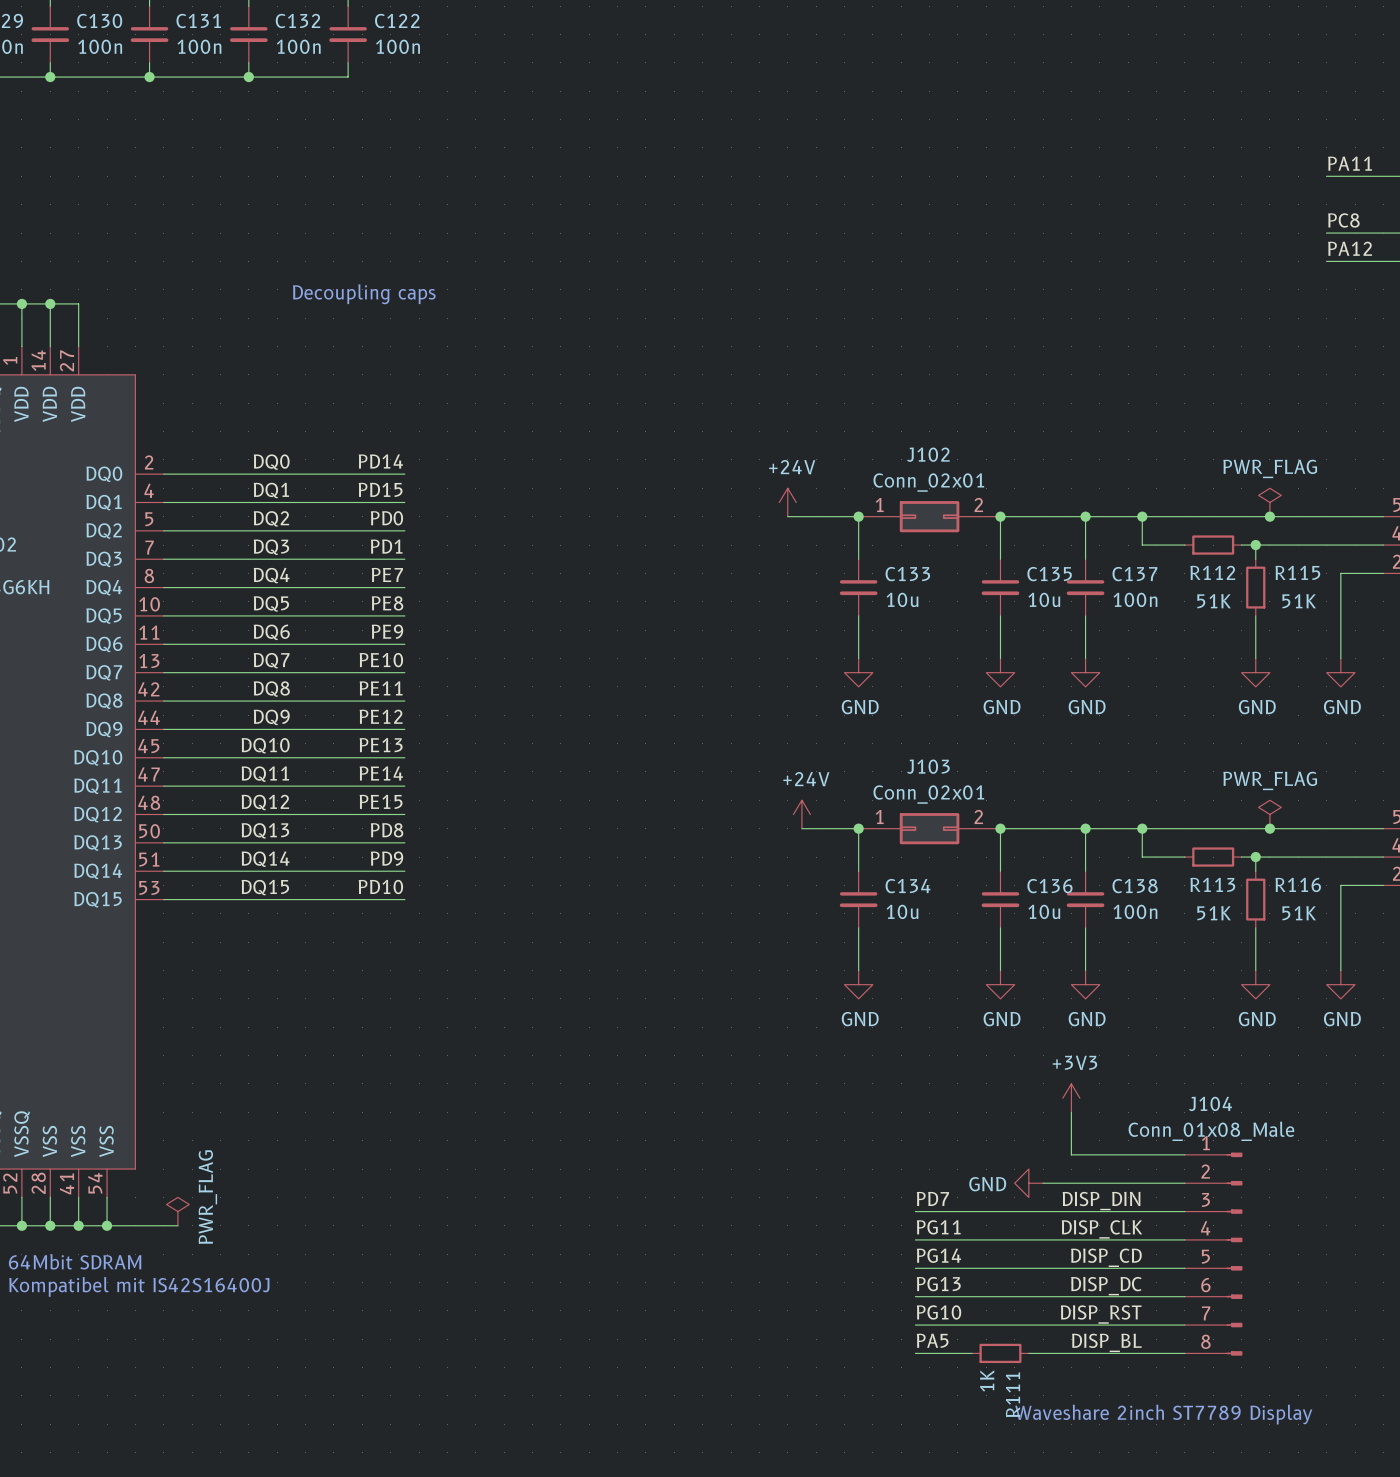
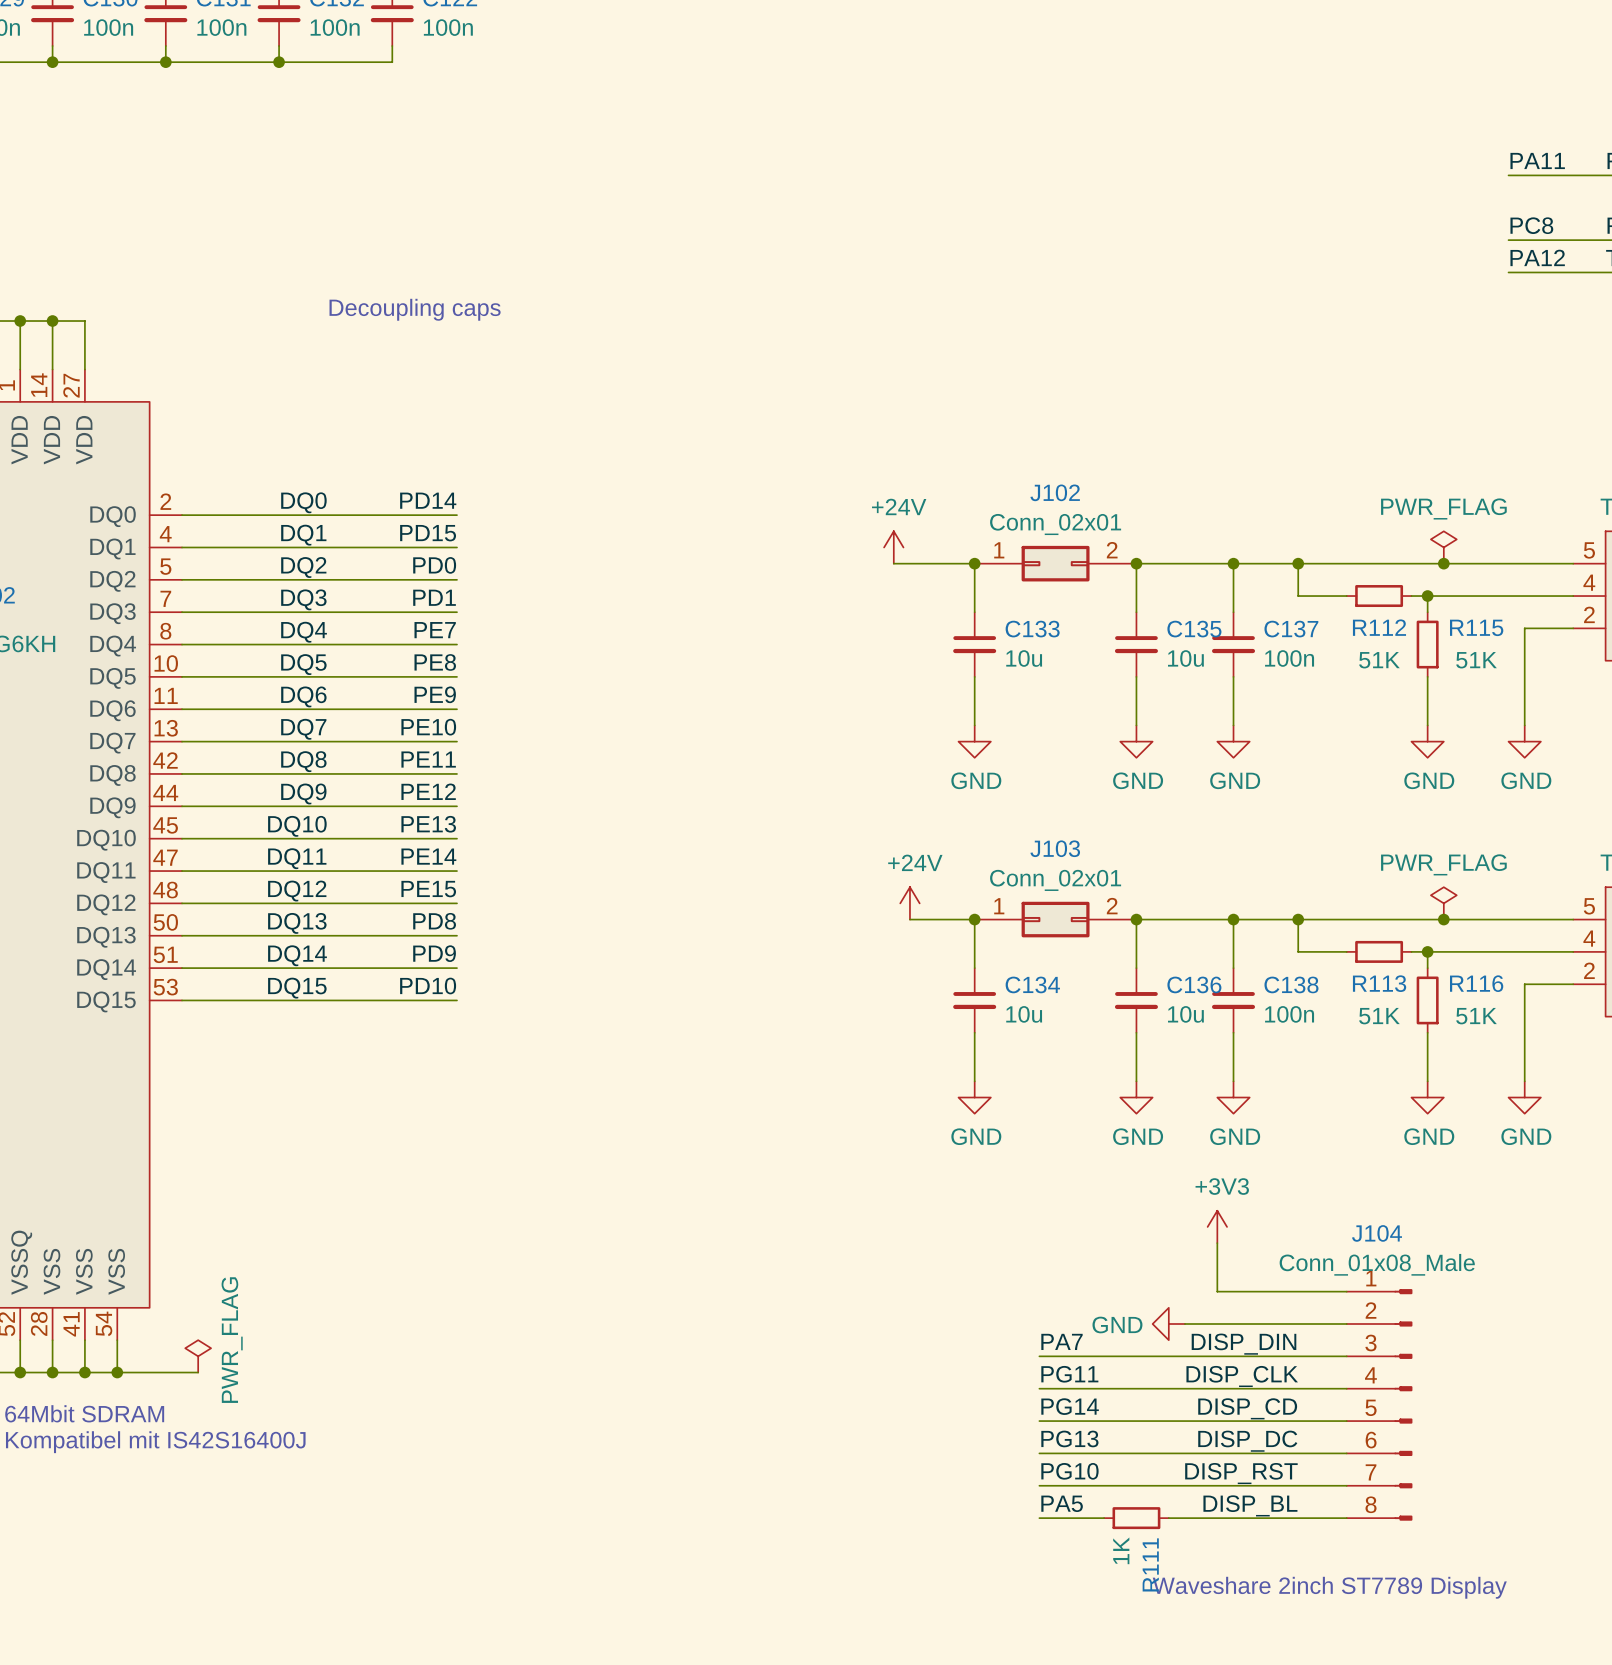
label: PD7 (932, 1198) -> PA7 (1061, 1341)

